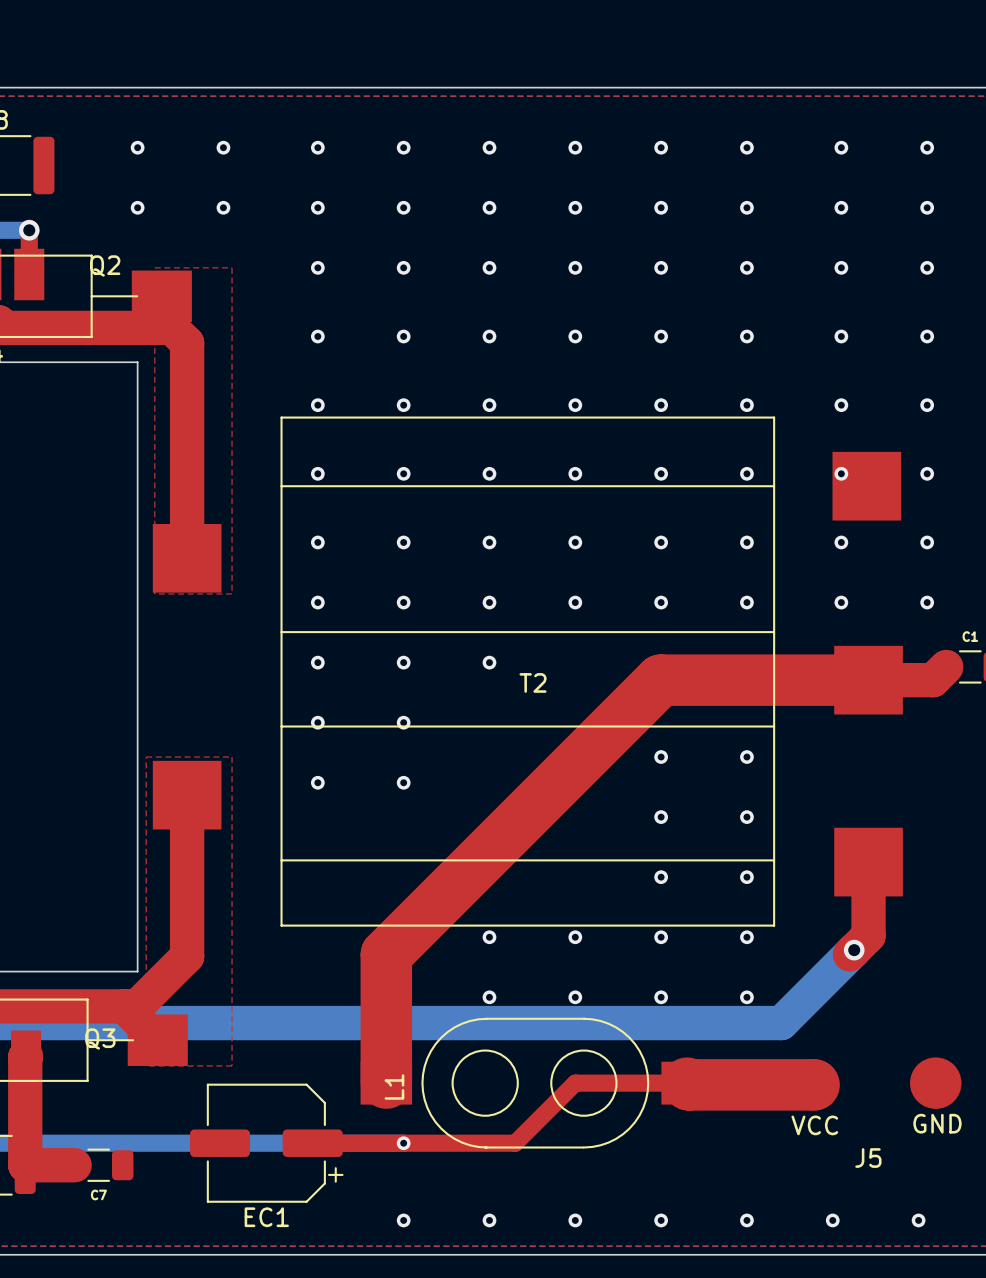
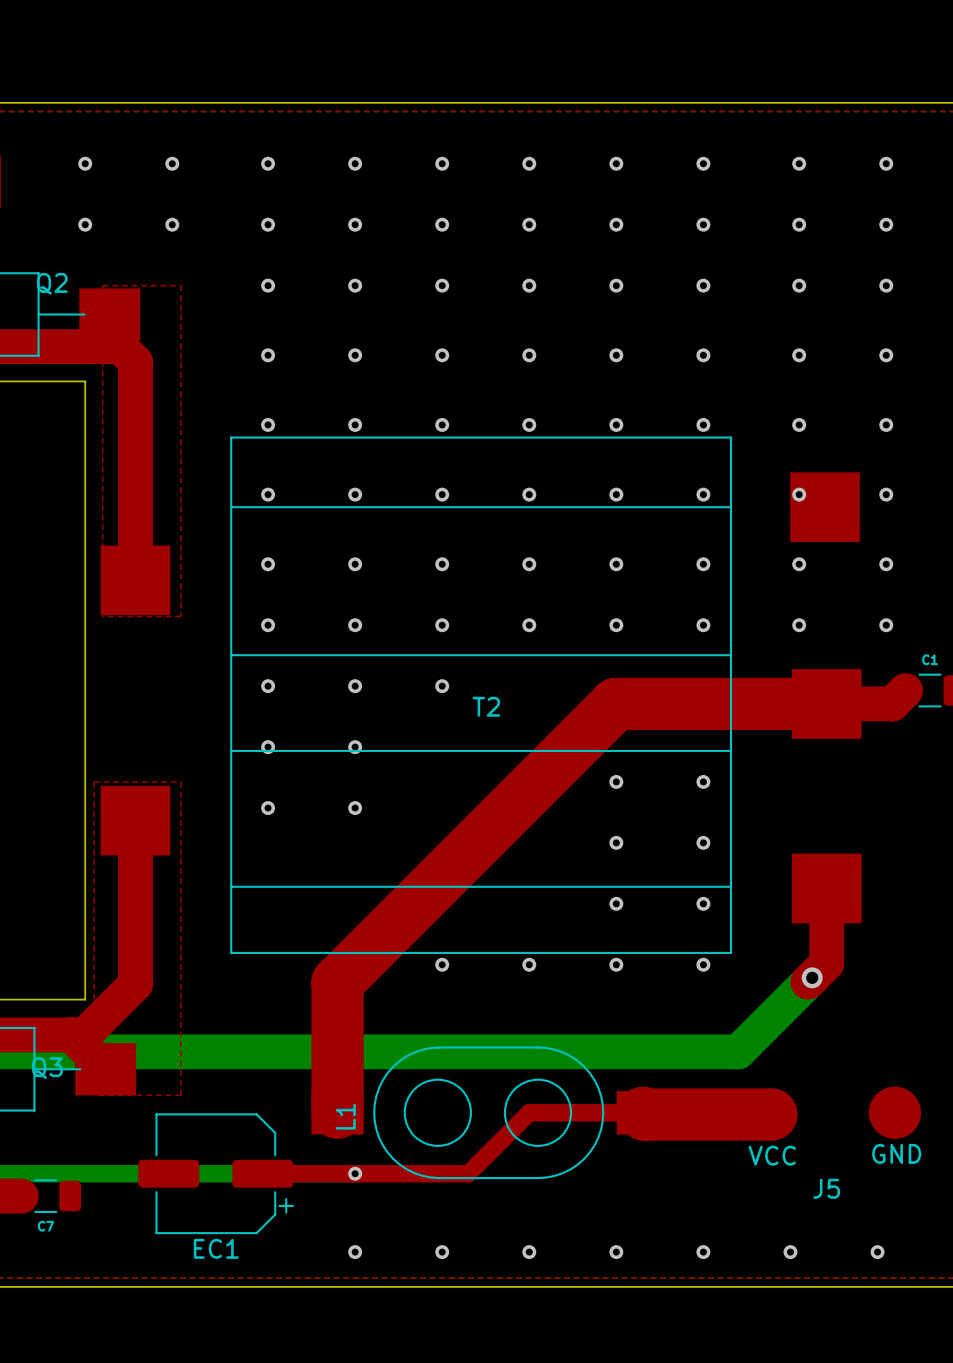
via: (489, 997) -> none
via: (575, 997) -> none
via: (661, 997) -> none
via: (746, 997) -> none

